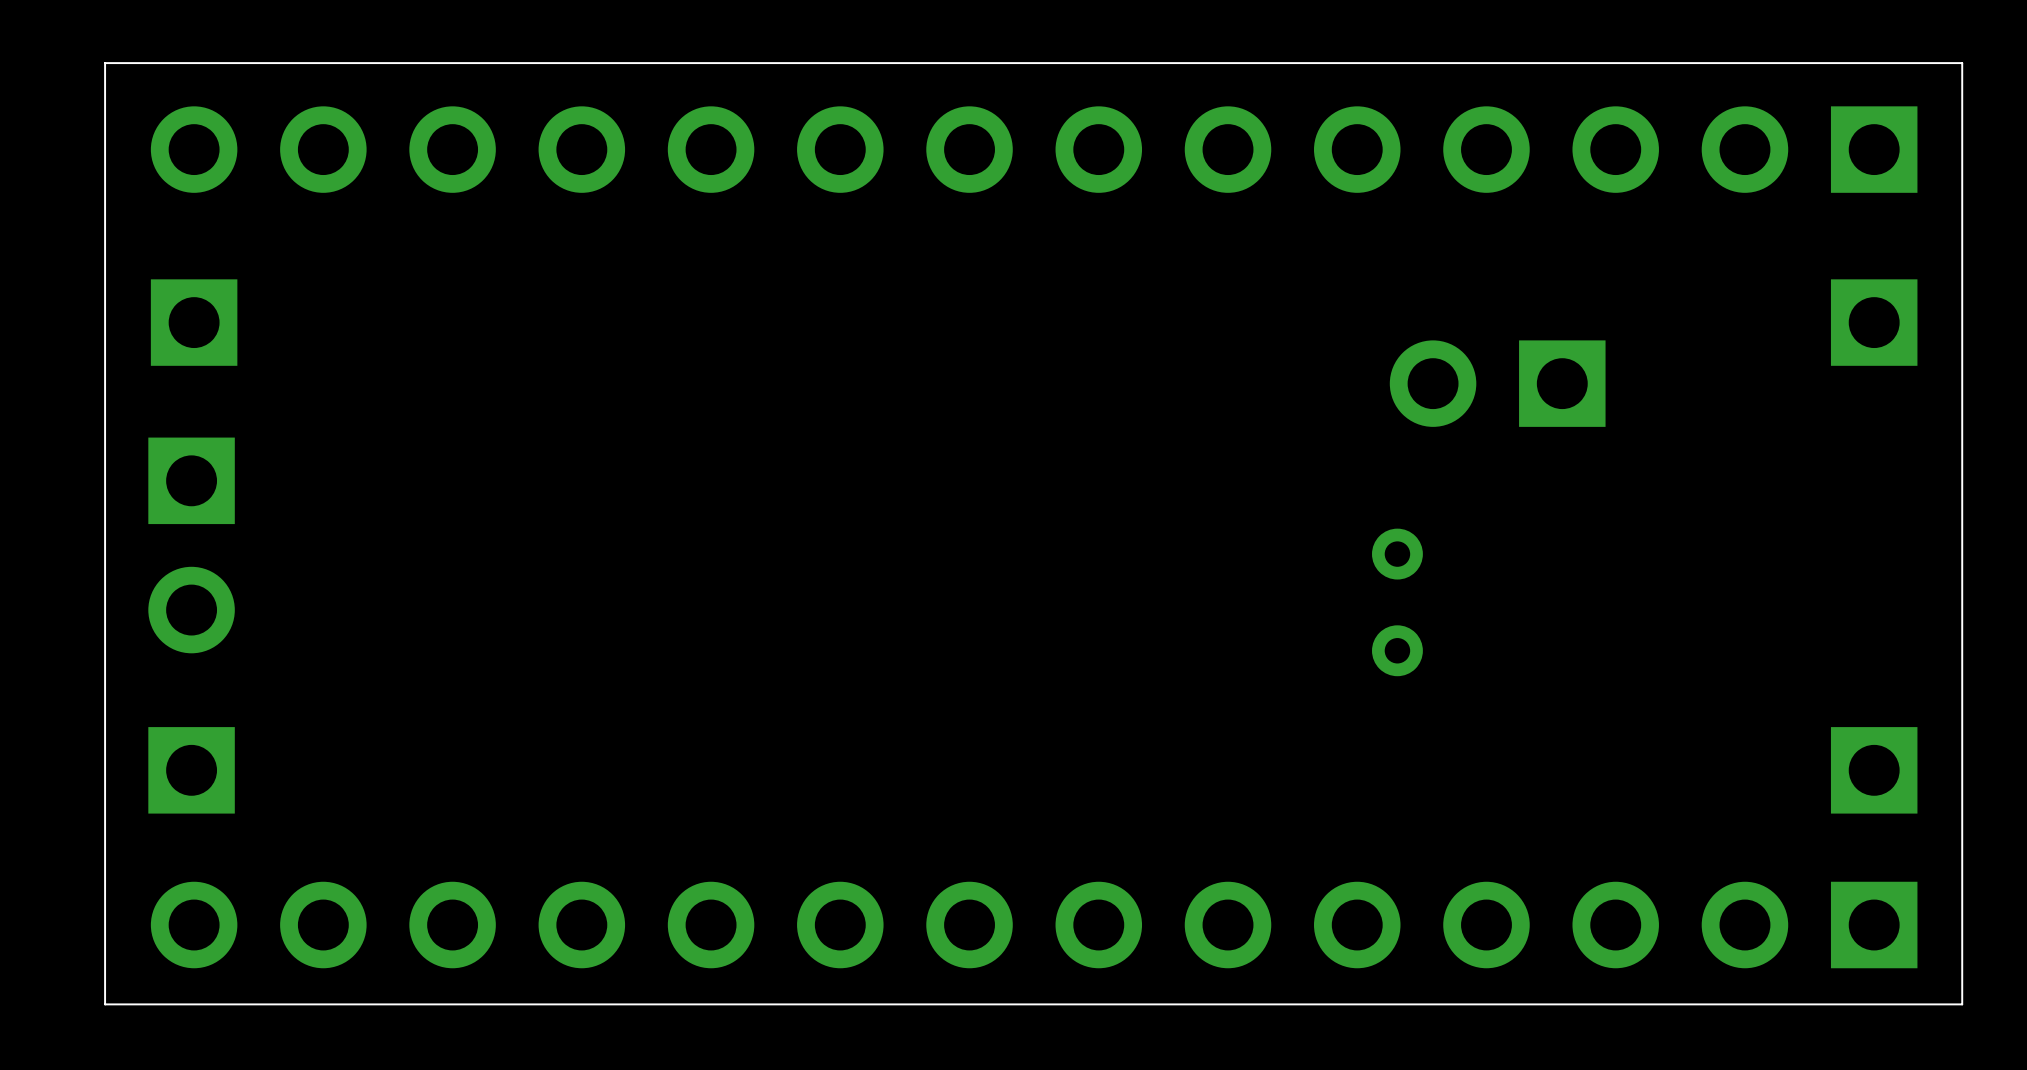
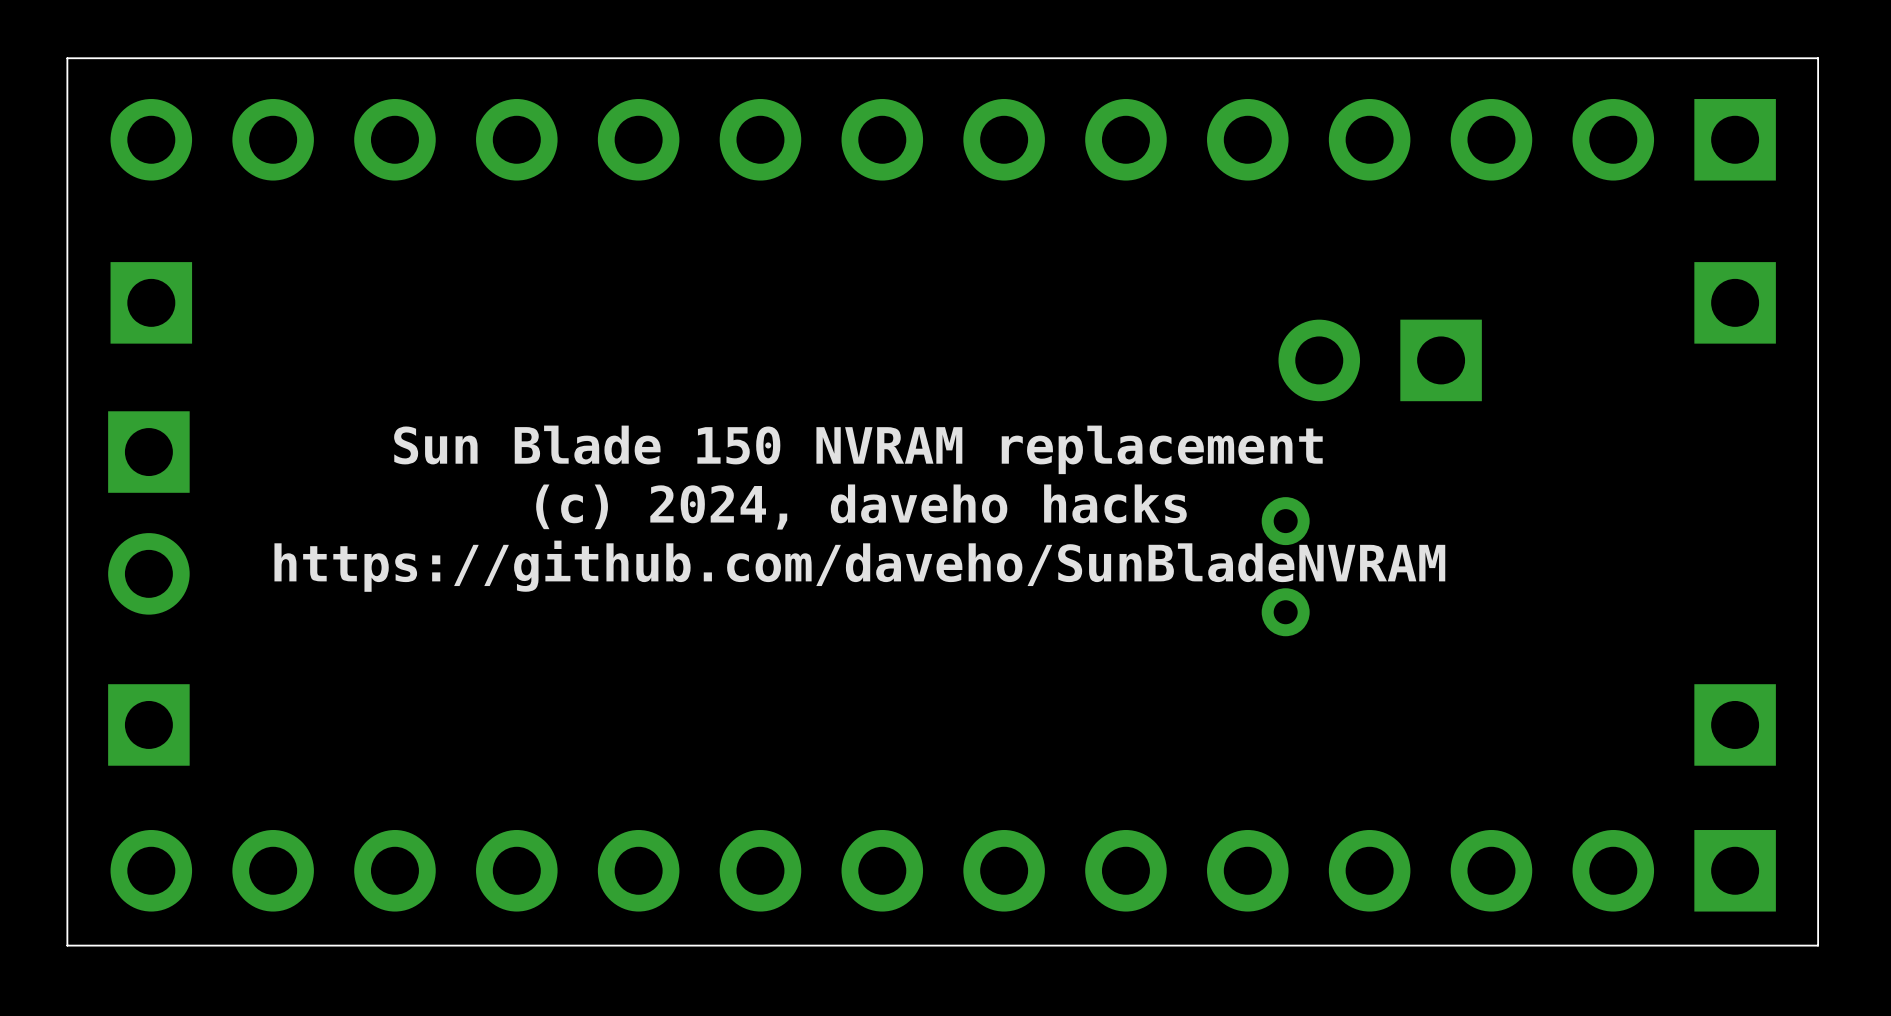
text: none -> Sun Blade 150 NVRAM replacement (858, 449)
text: none -> (c) 2024, daveho hacks (861, 507)
text: none -> https://github.com/daveho/SunBladeNVRAM (859, 566)

